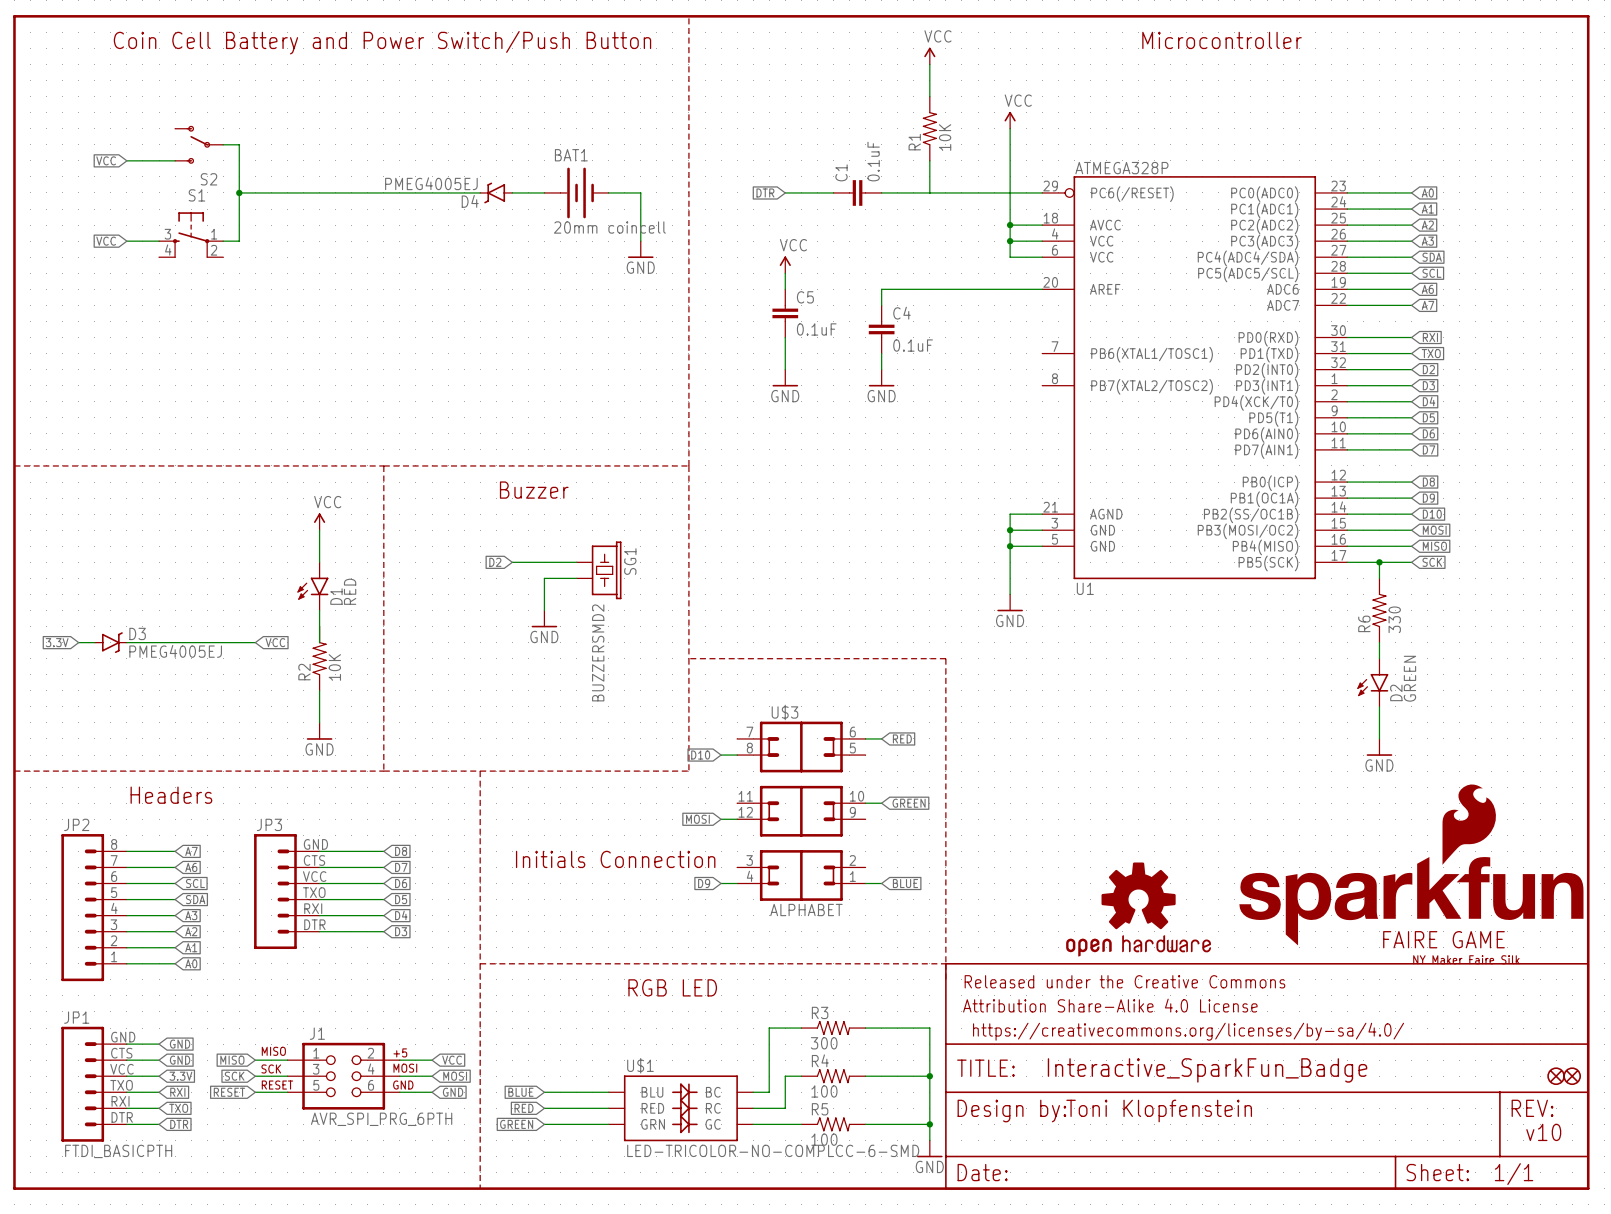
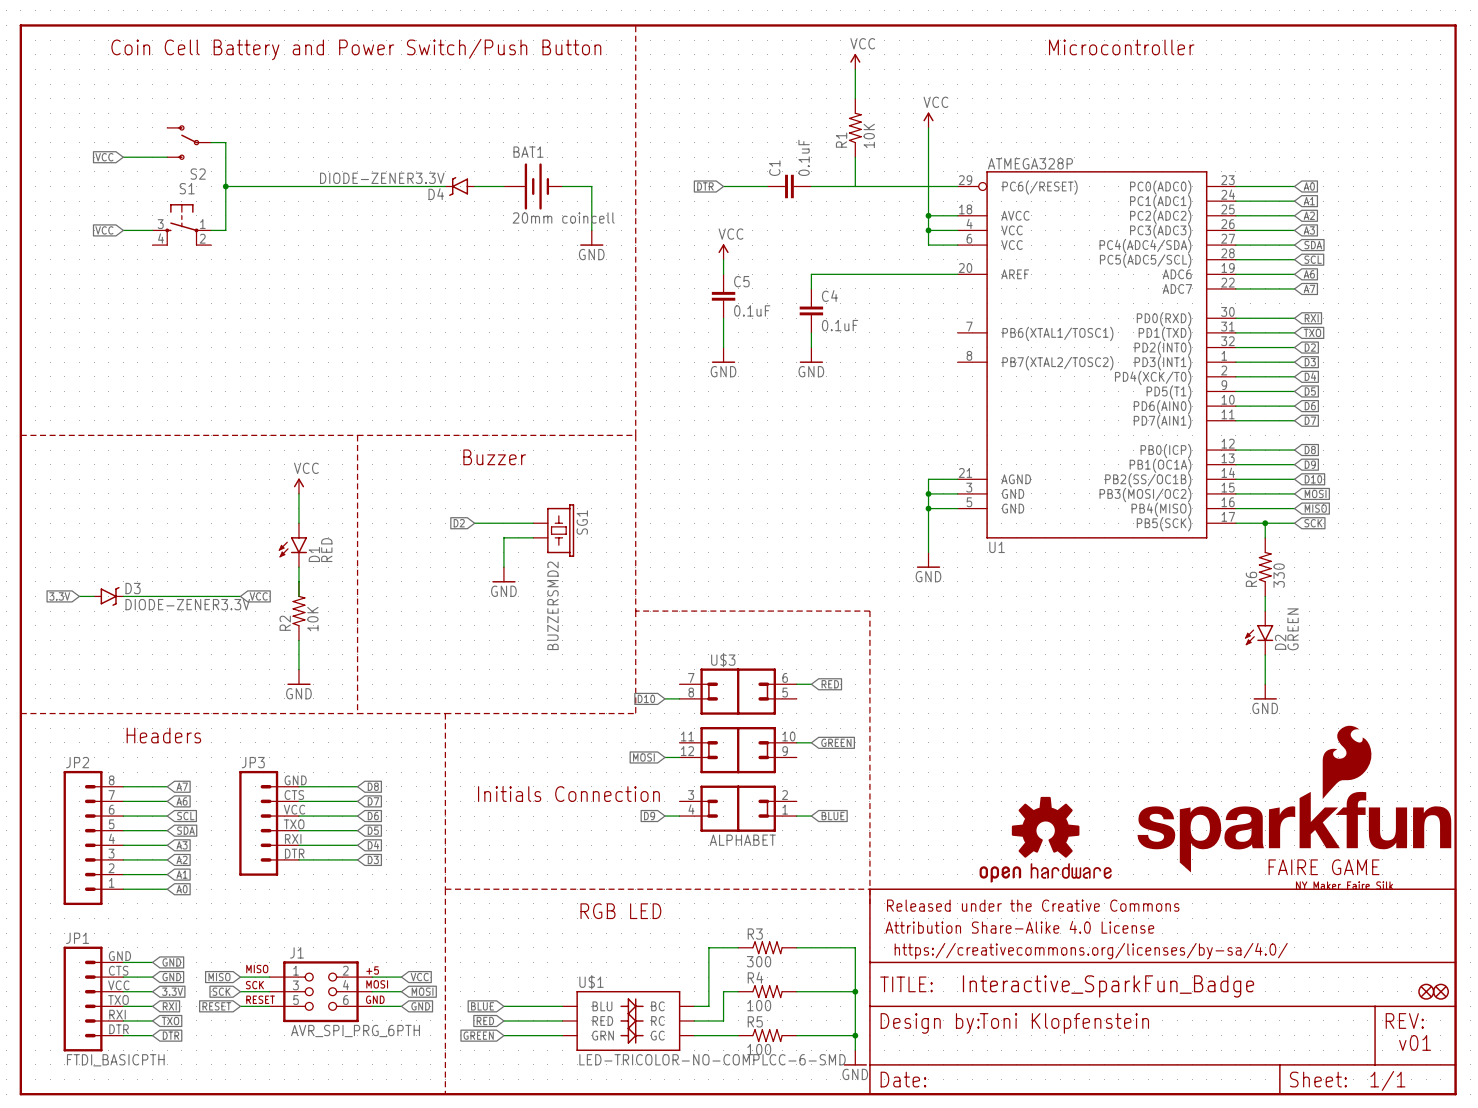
D4 value: PMEG4005EJ (431, 183) -> DIODE-ZENER3.3V (382, 178)
D3 value: PMEG4005EJ (175, 651) -> DIODE-ZENER3.3V (187, 604)
text: v10 (1543, 1132) -> v01 (1415, 1042)

